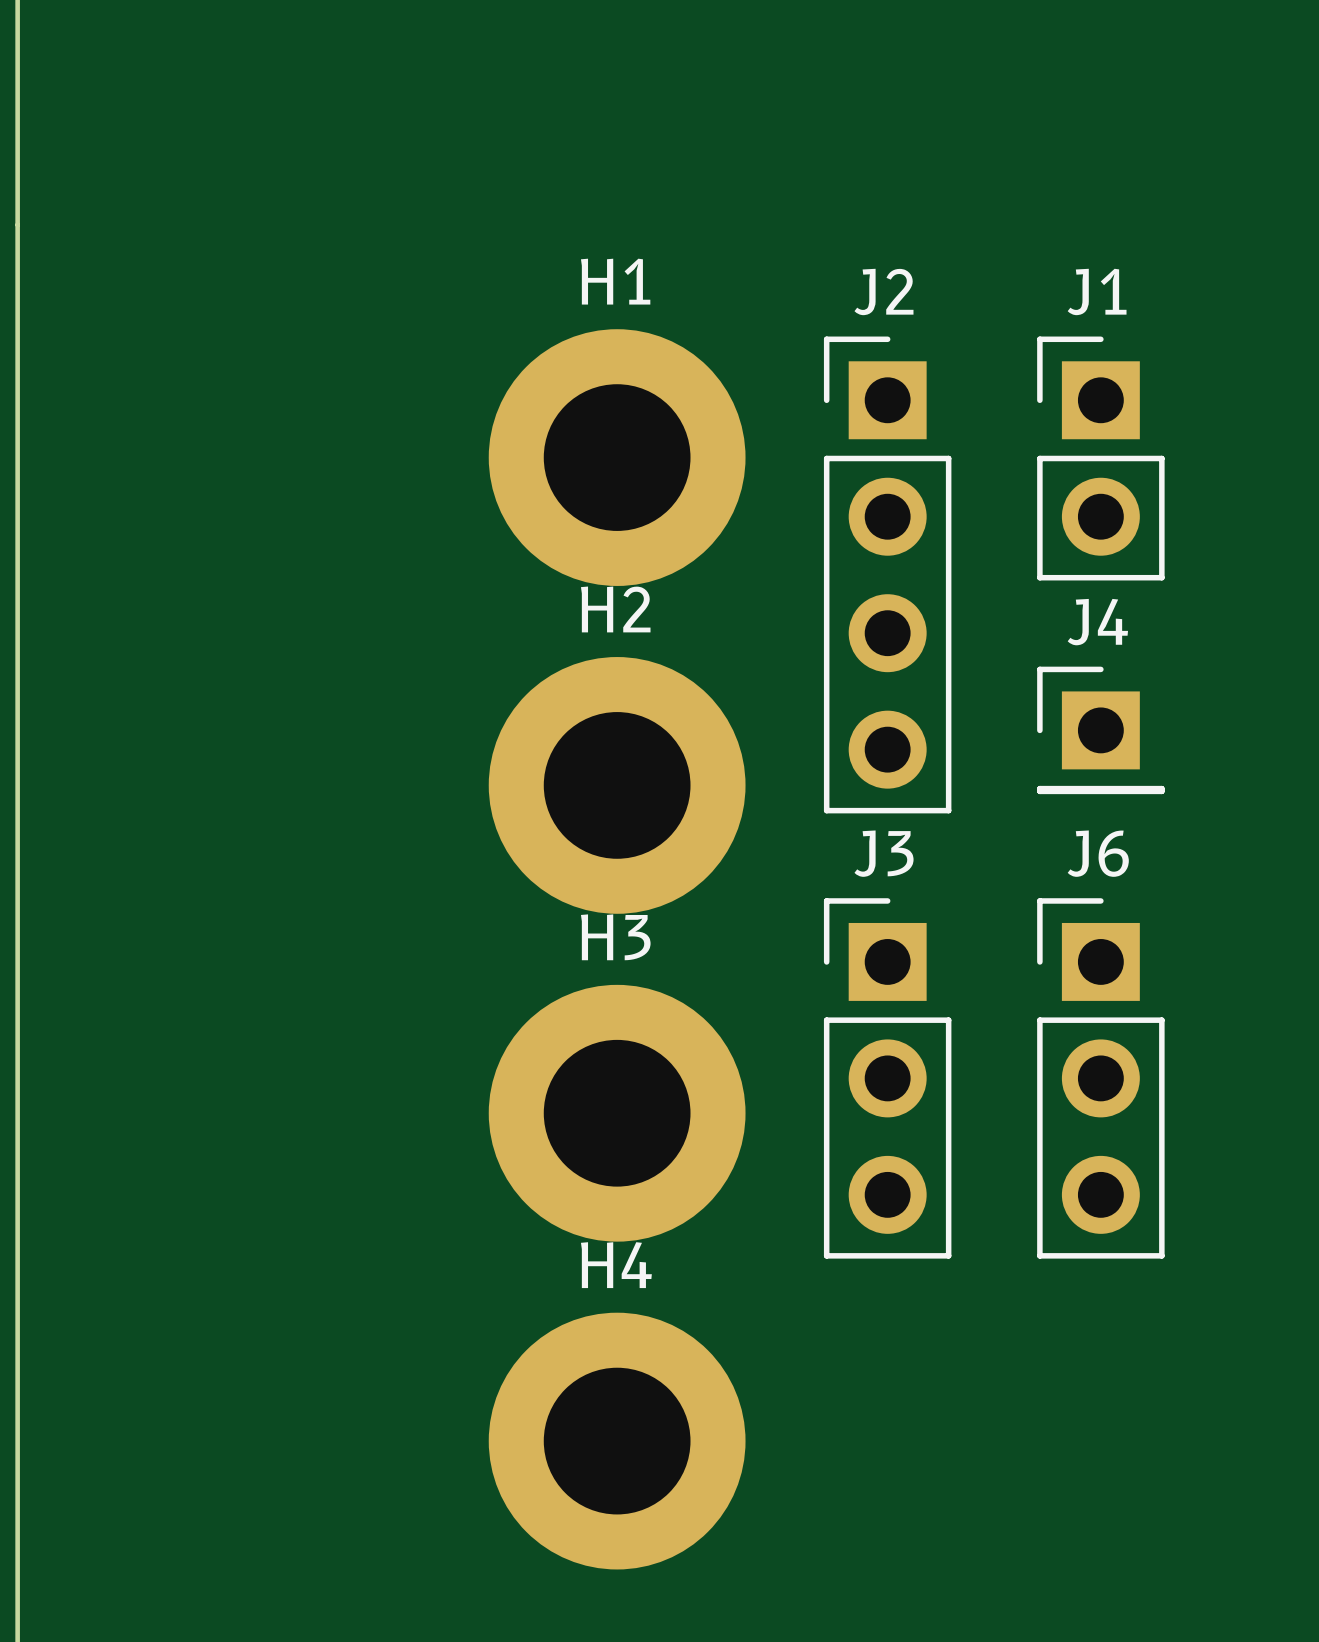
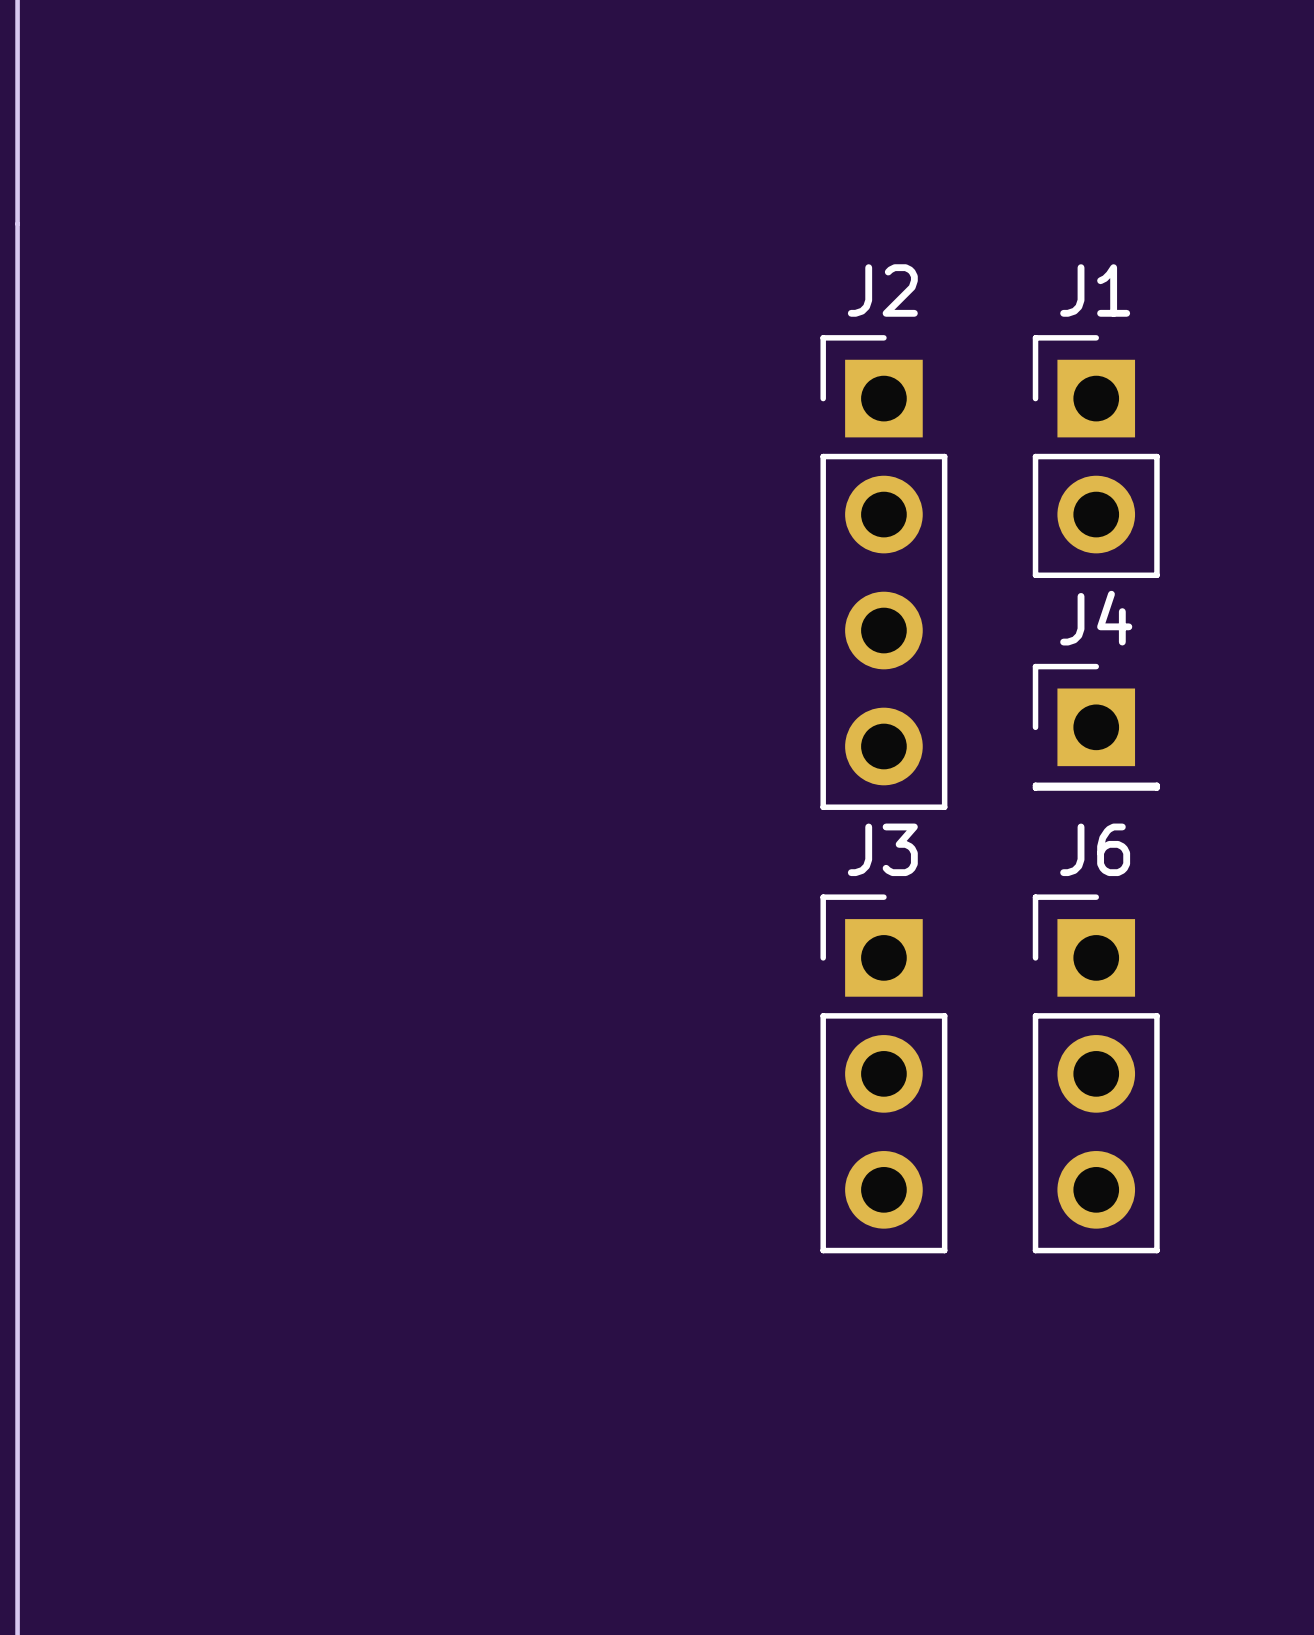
H1: (617, 457) -> none
H2: (617, 785) -> none
H3: (617, 1113) -> none
H4: (617, 1441) -> none

